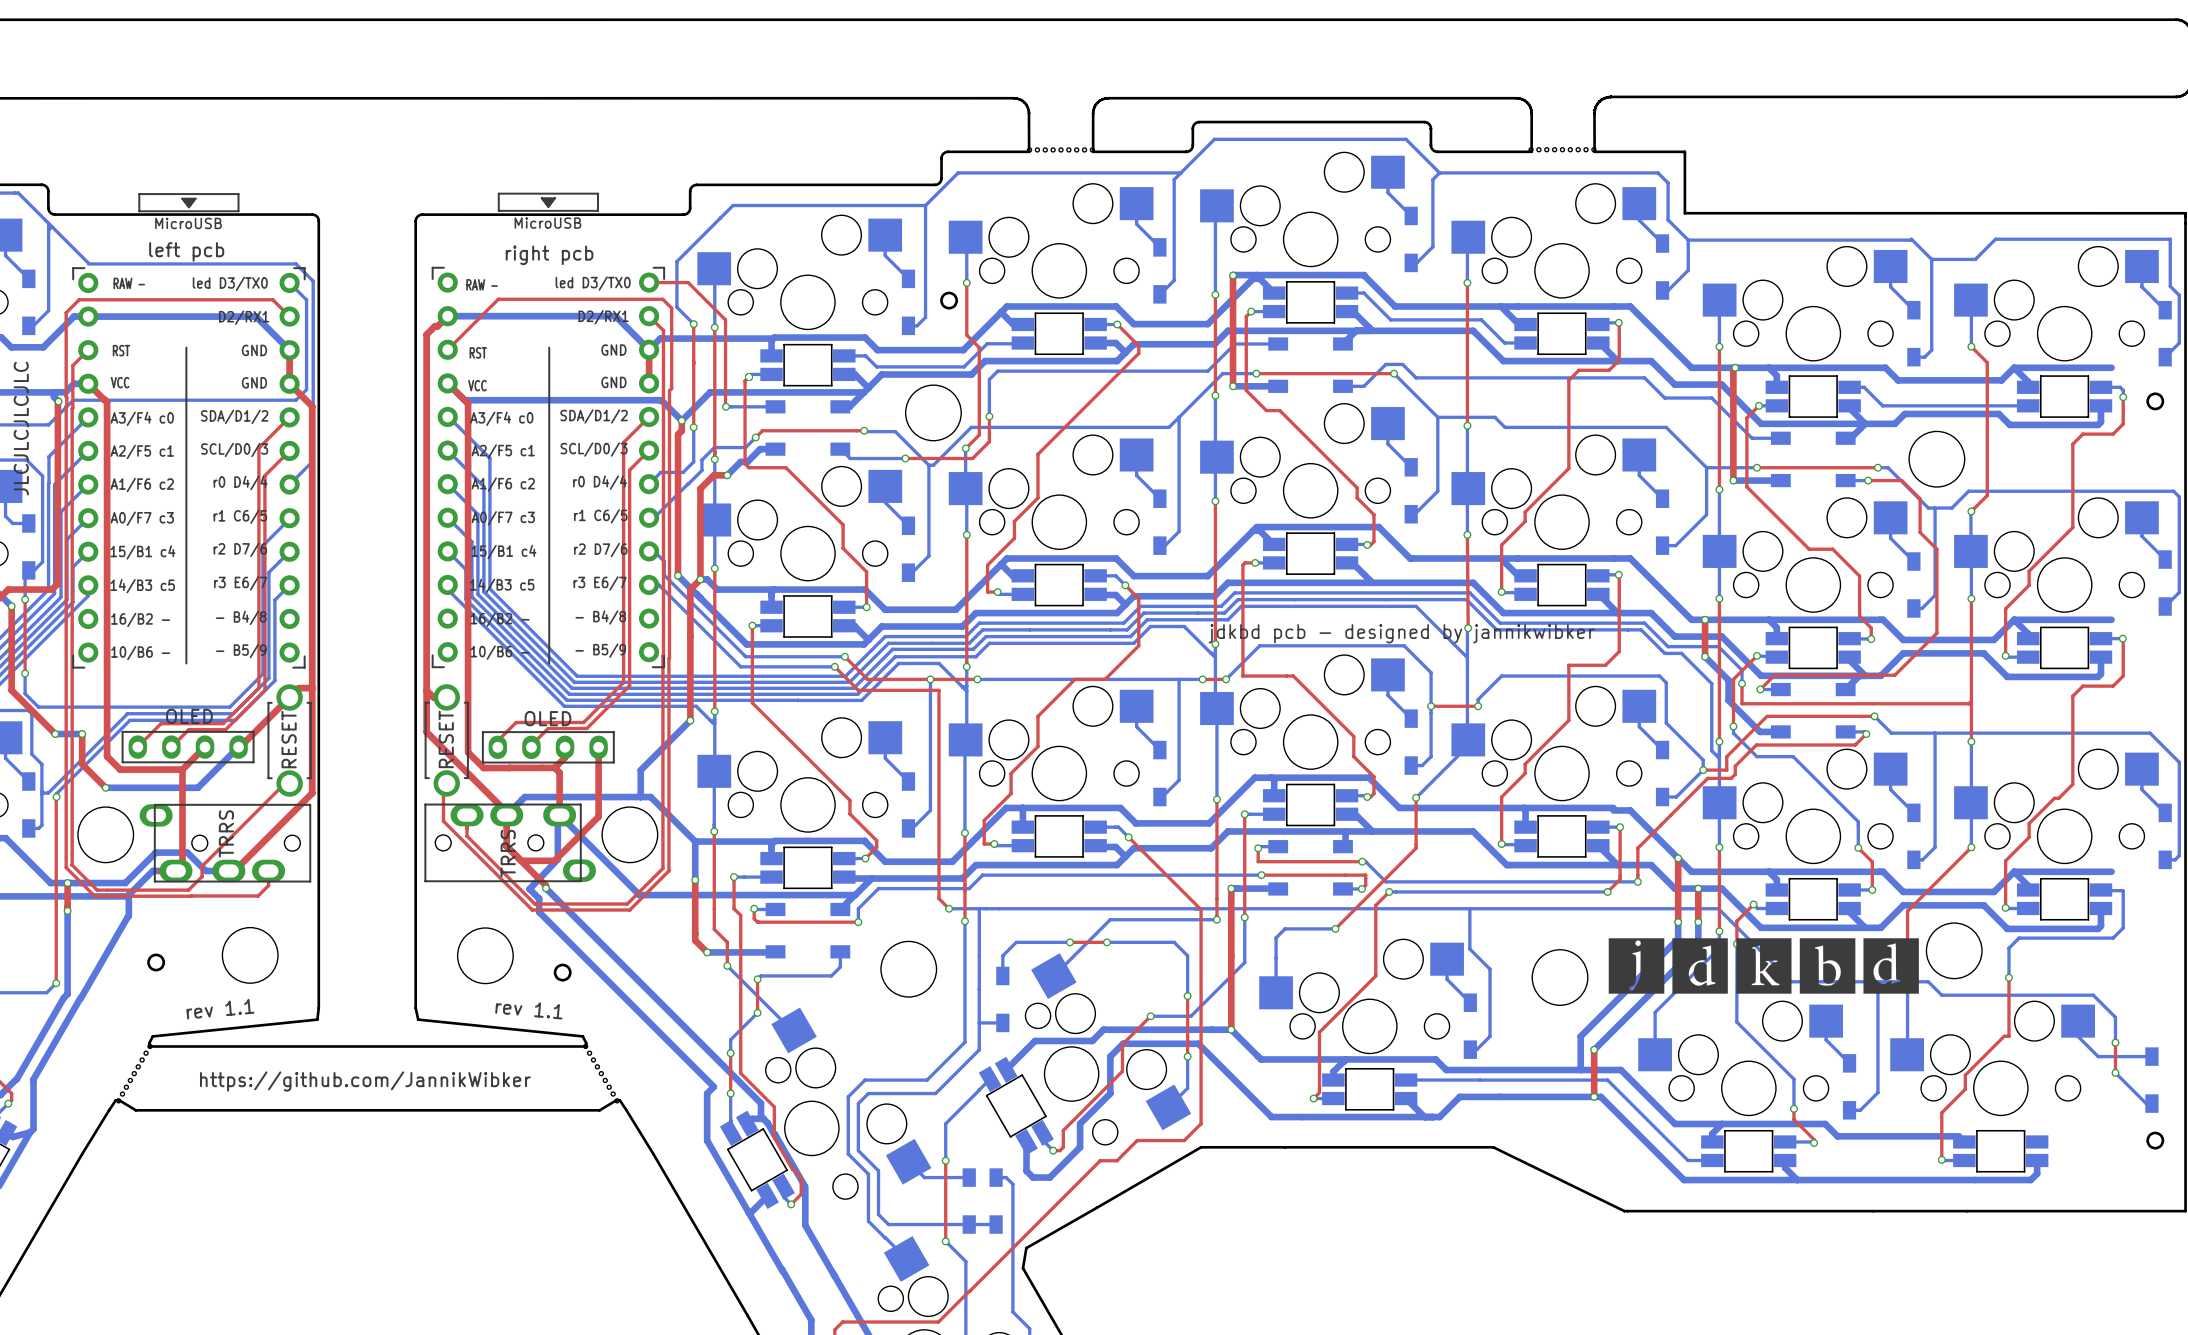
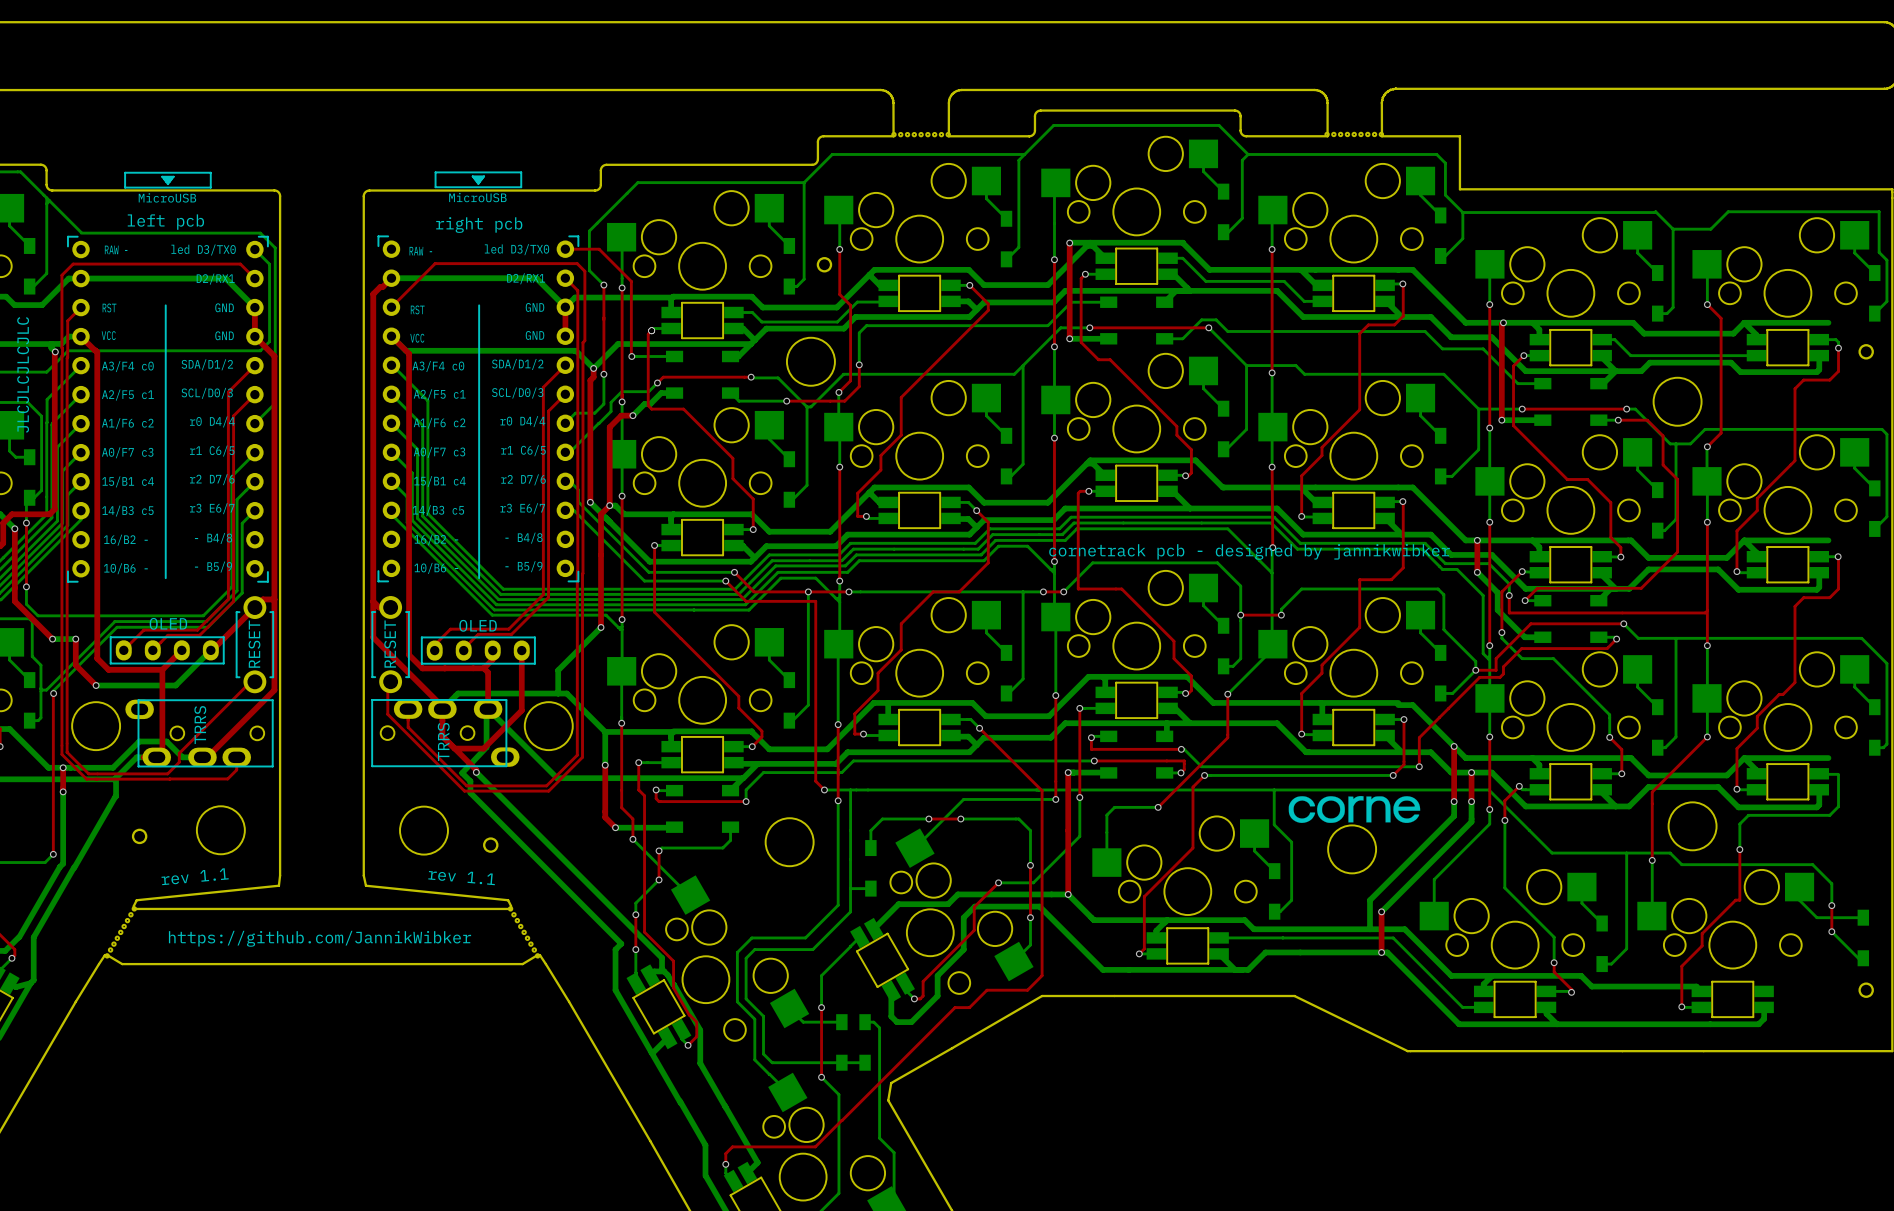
text: jdkbd pcb - designed by jannikwibker (1401, 633) -> cornetrack pcb - designed by jannikwibker (1249, 551)
drawing: none -> [1288, 796, 1421, 823]
drawing: [1608, 938, 1919, 994] -> none

